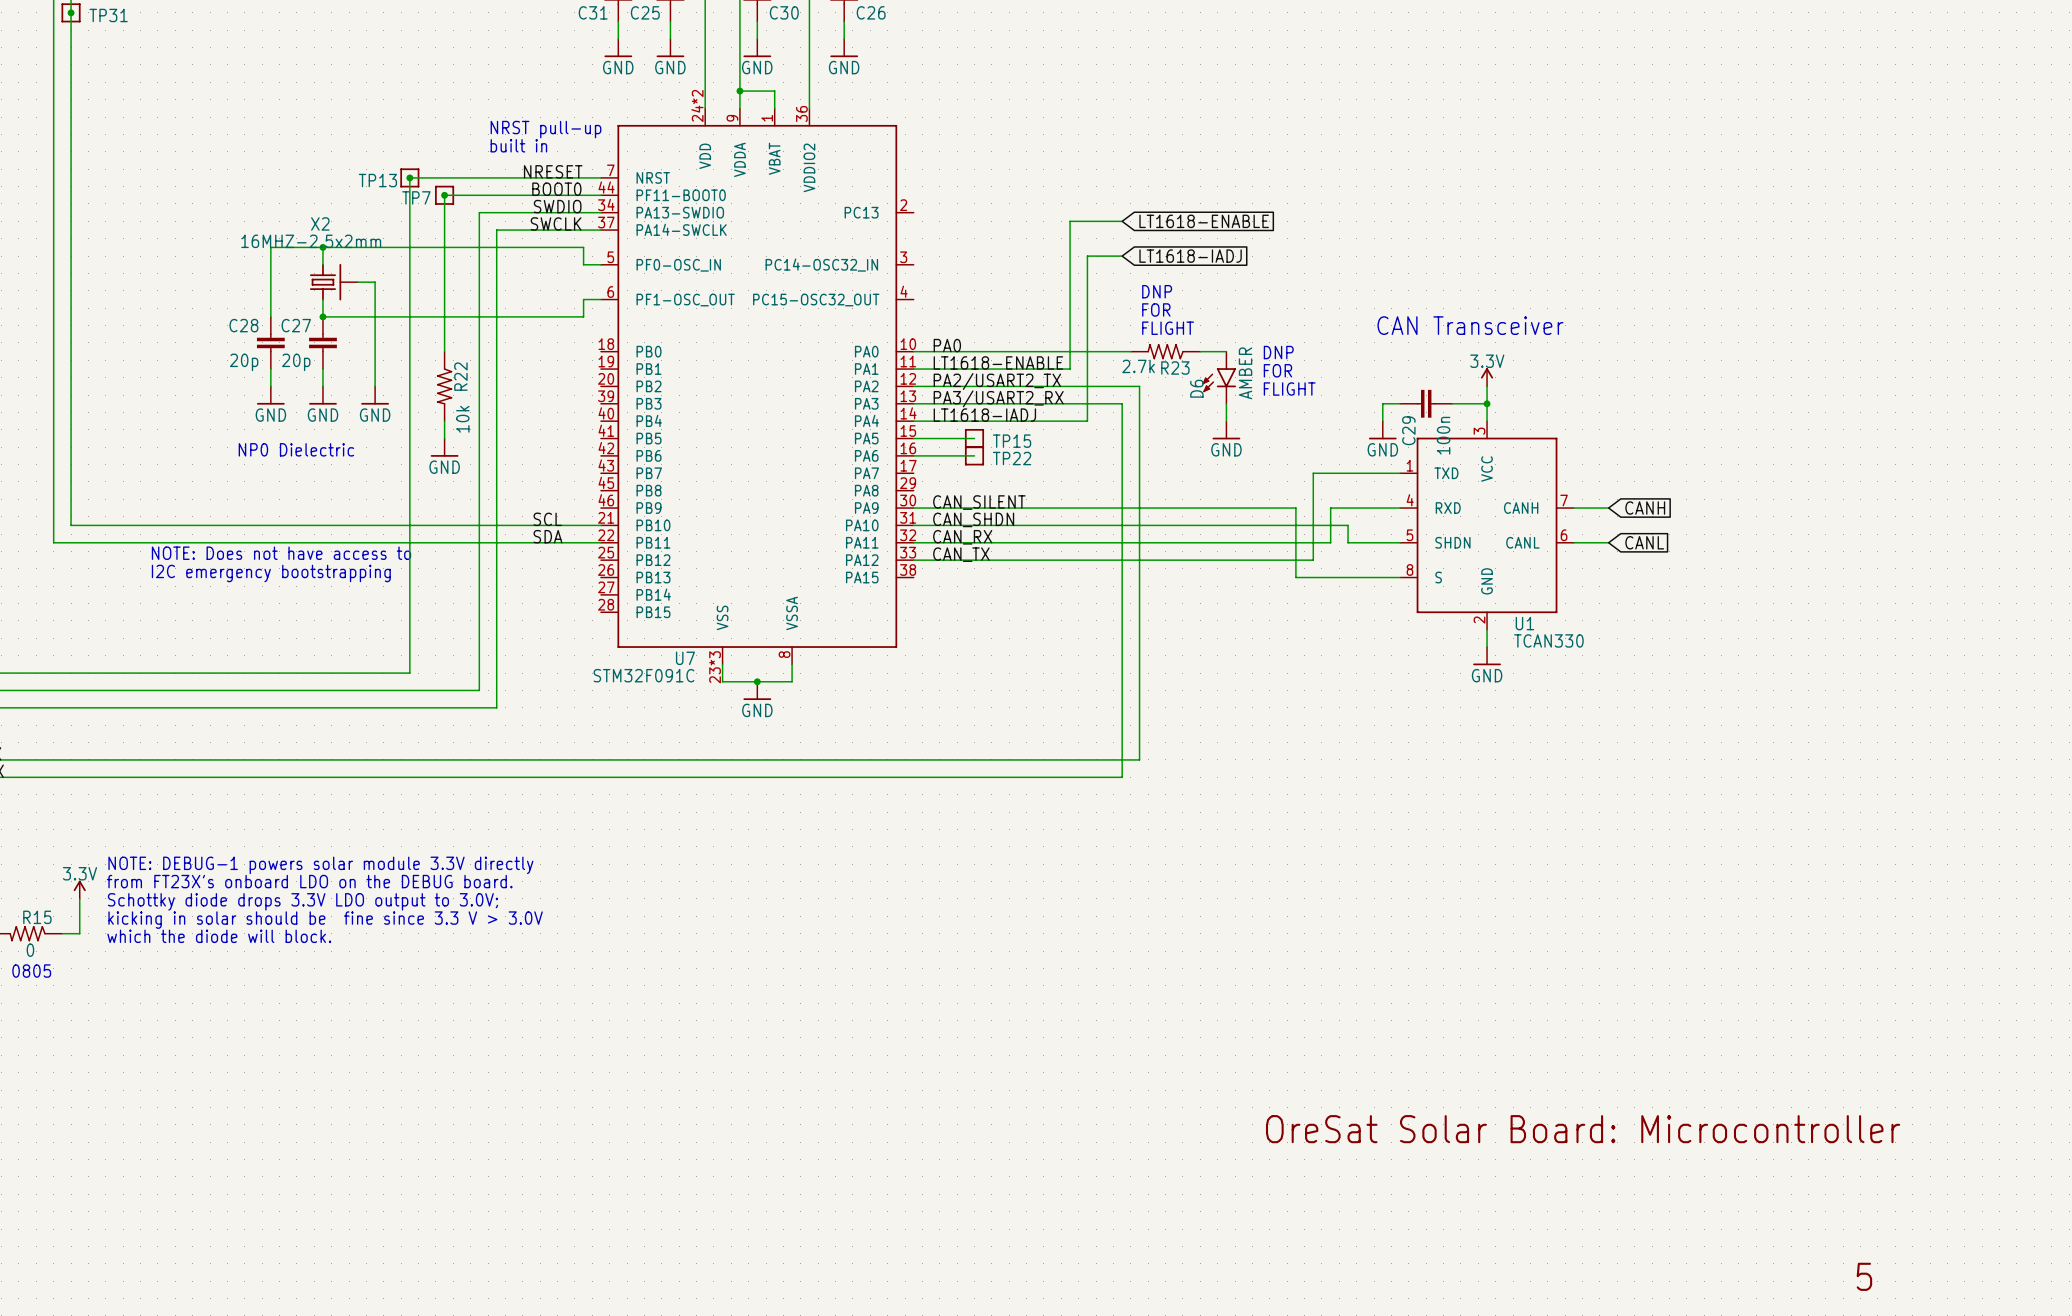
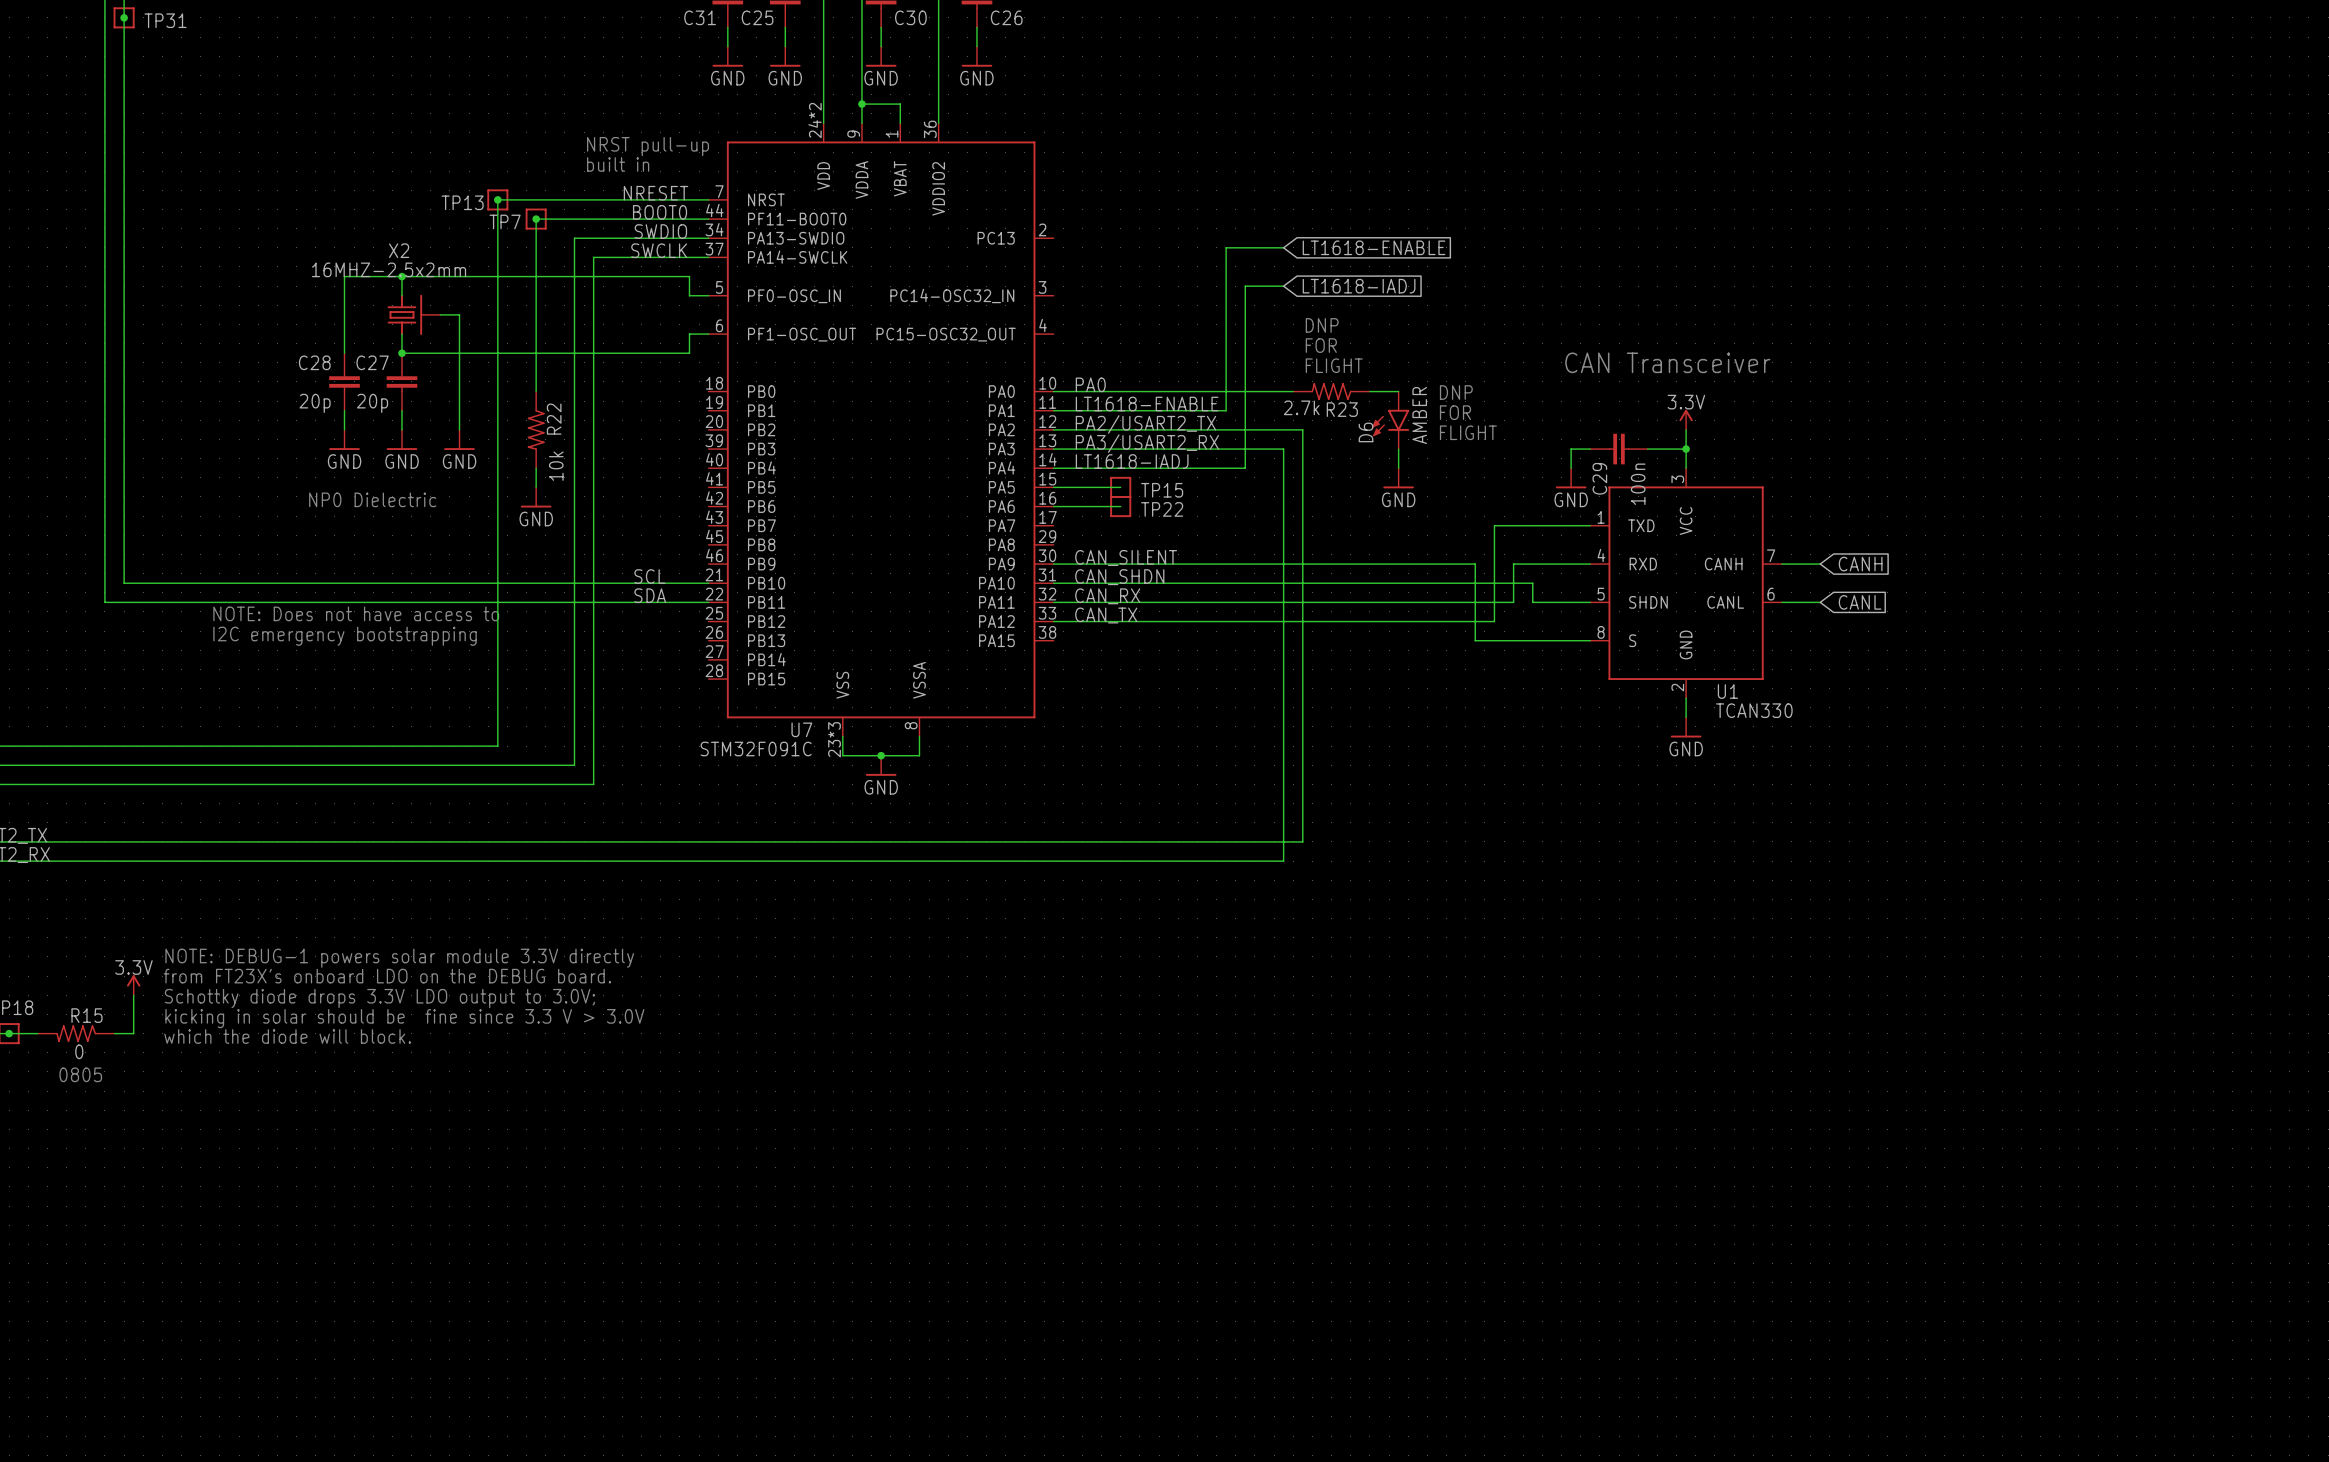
text: OreSat Solar Board: Microcontroller (1583, 1129) -> none
text: 5 (1864, 1276) -> none

